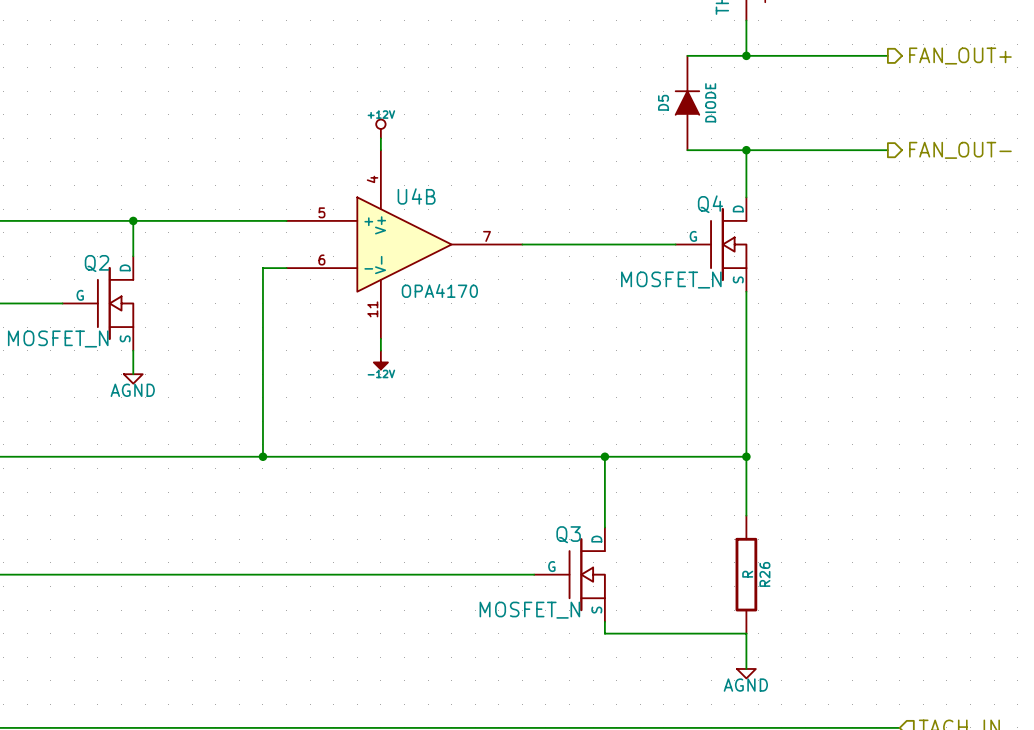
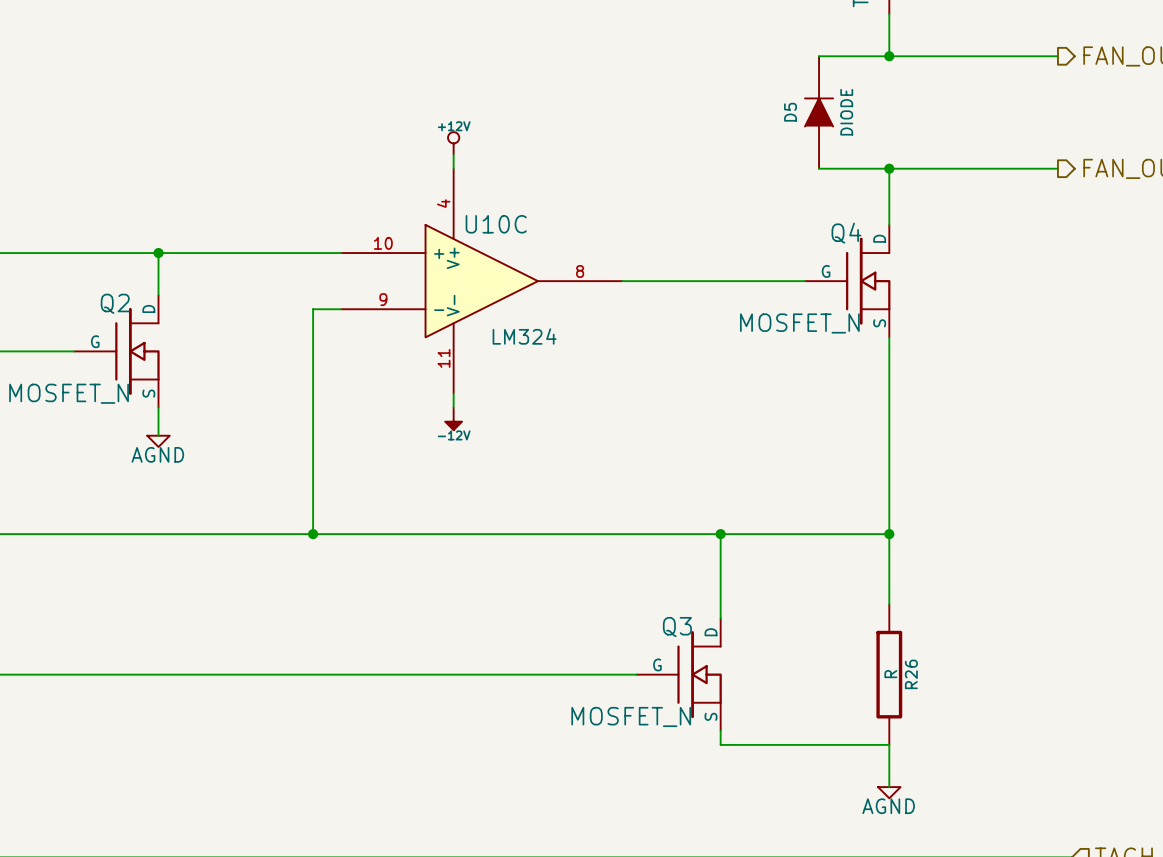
U4B name: U4B (416, 196) -> U10C (496, 224)
U4B pin number: 5 (321, 212) -> 10 (383, 243)
U4B pin number: 7 (487, 236) -> 8 (580, 271)
U4B pin number: 6 (321, 259) -> 9 (383, 299)
U4B value: OPA4170 (439, 290) -> LM324 (524, 336)

